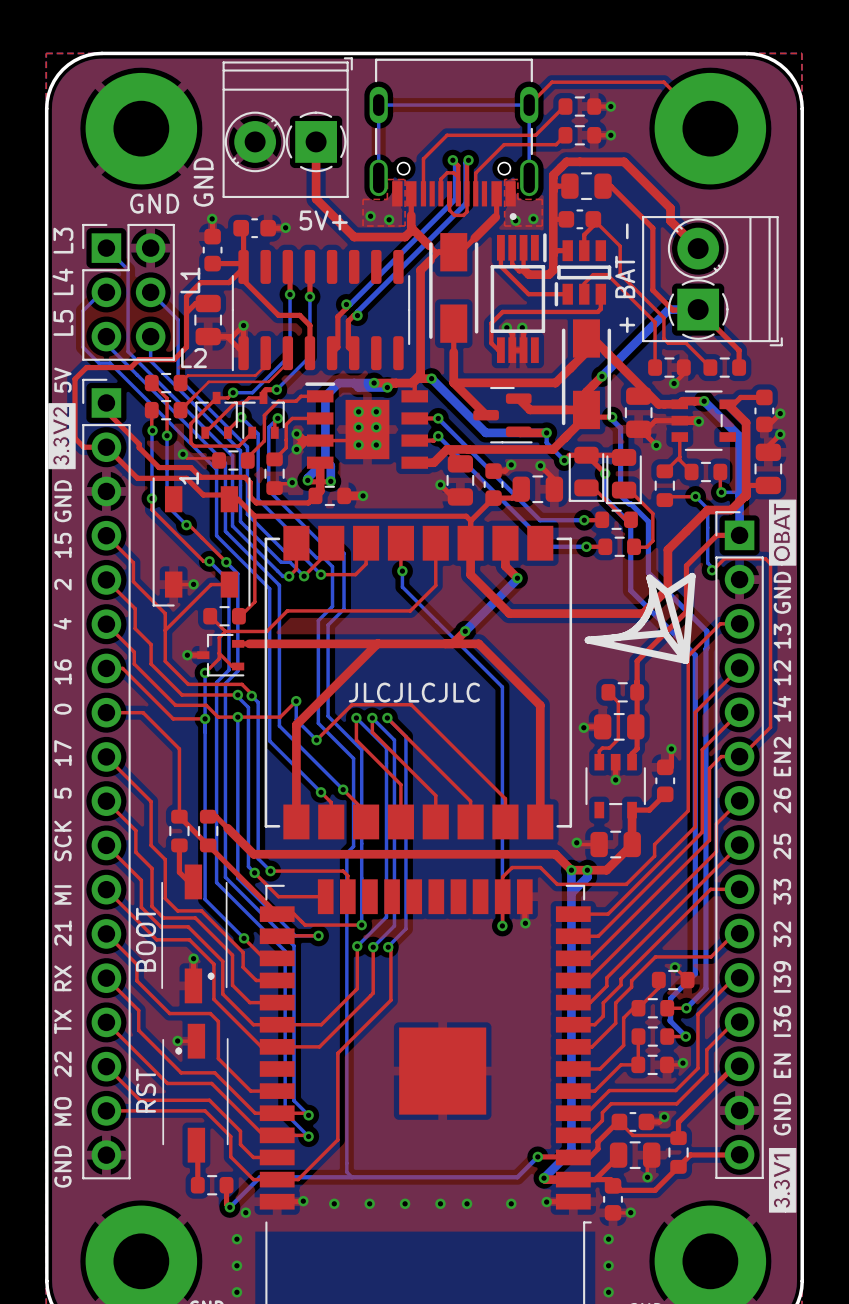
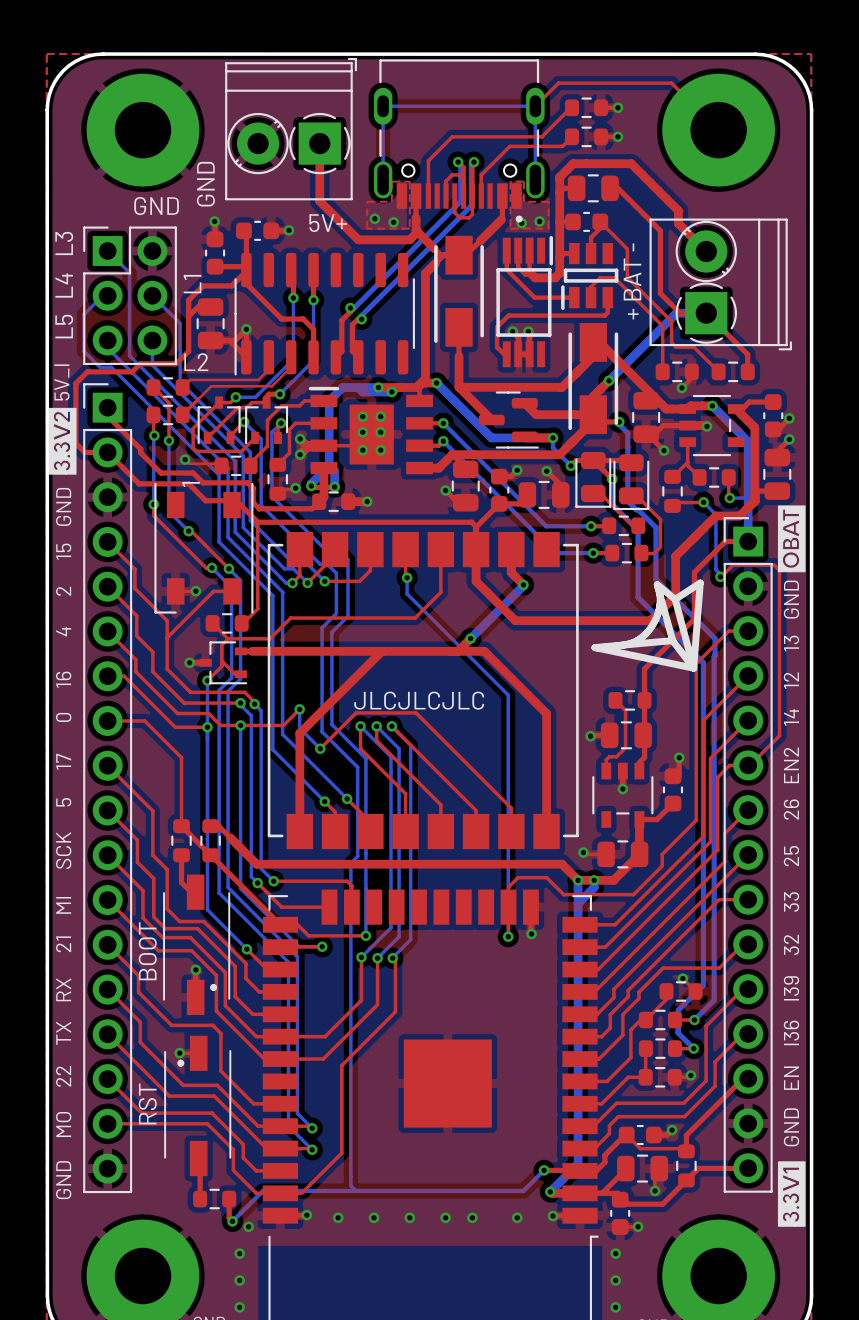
text: 5V (62, 380) -> 5V_I (61, 382)

